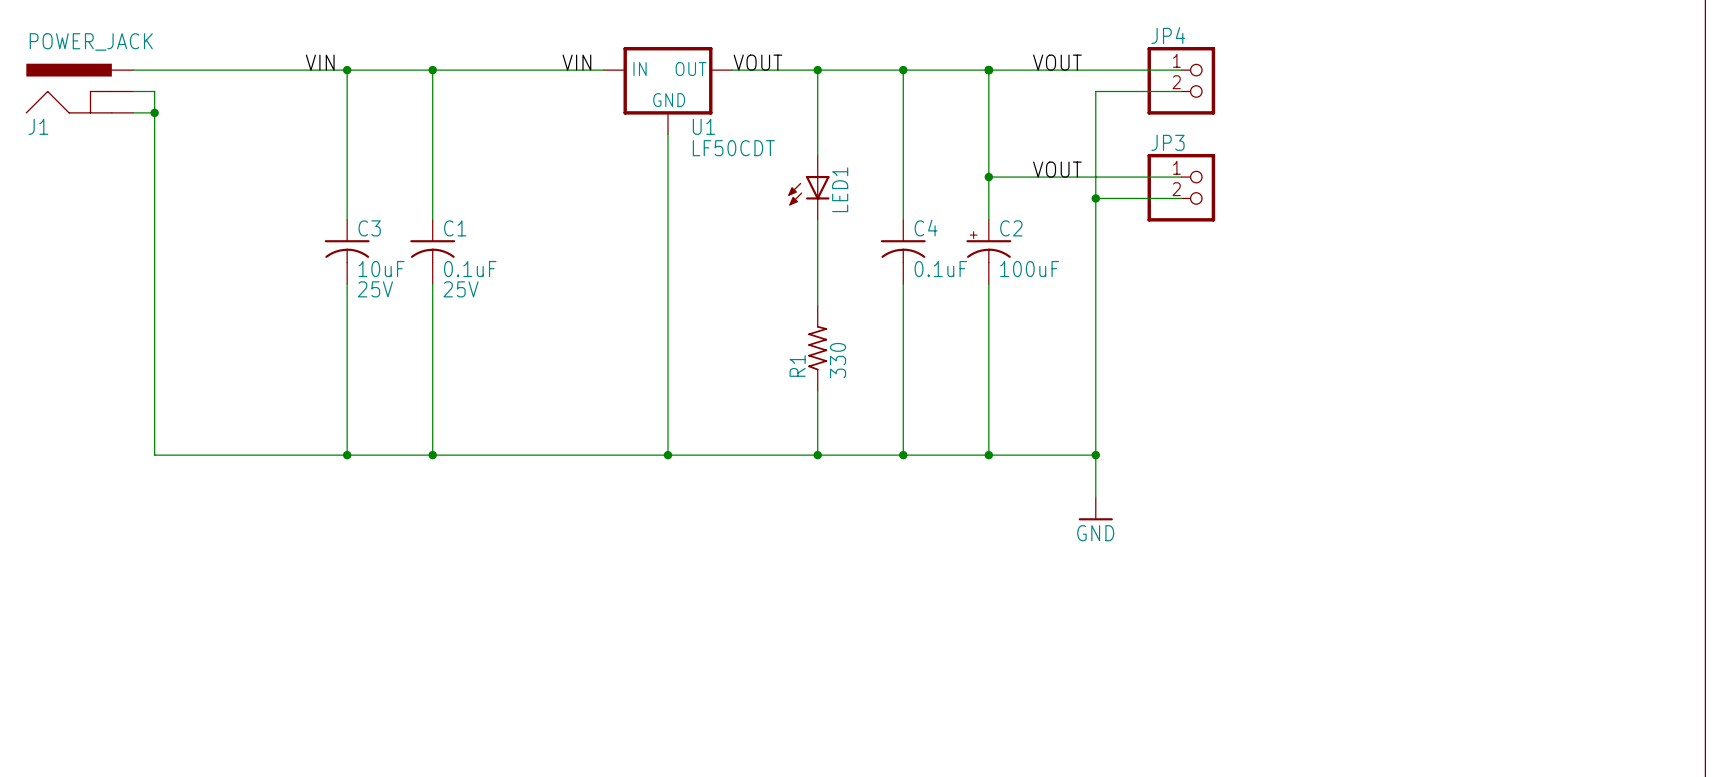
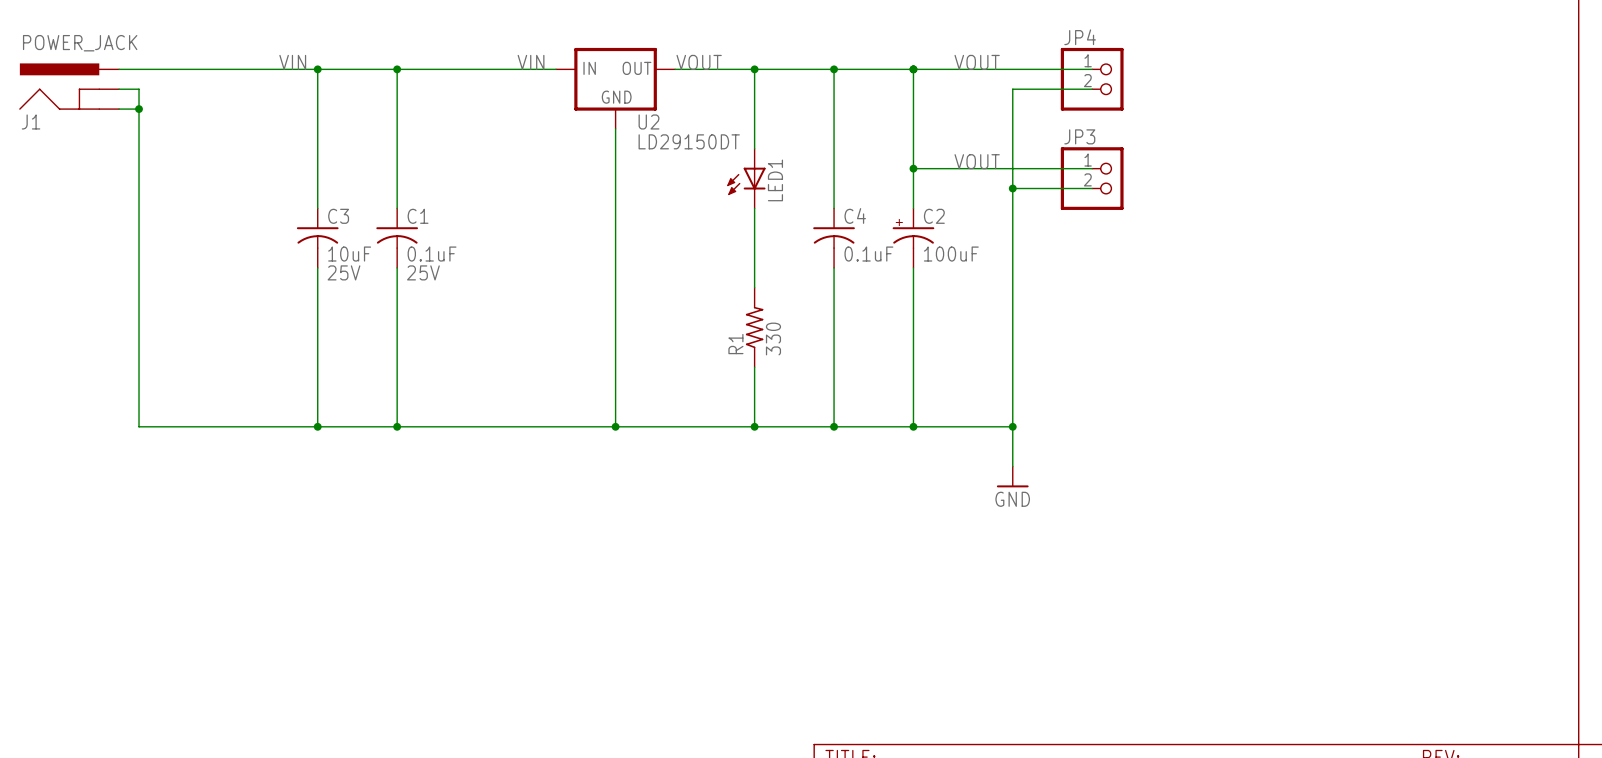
U1 name: U1 (703, 126) -> U2 (648, 121)
U1 value: LF50CDT (733, 148) -> LD29150DT (689, 141)

